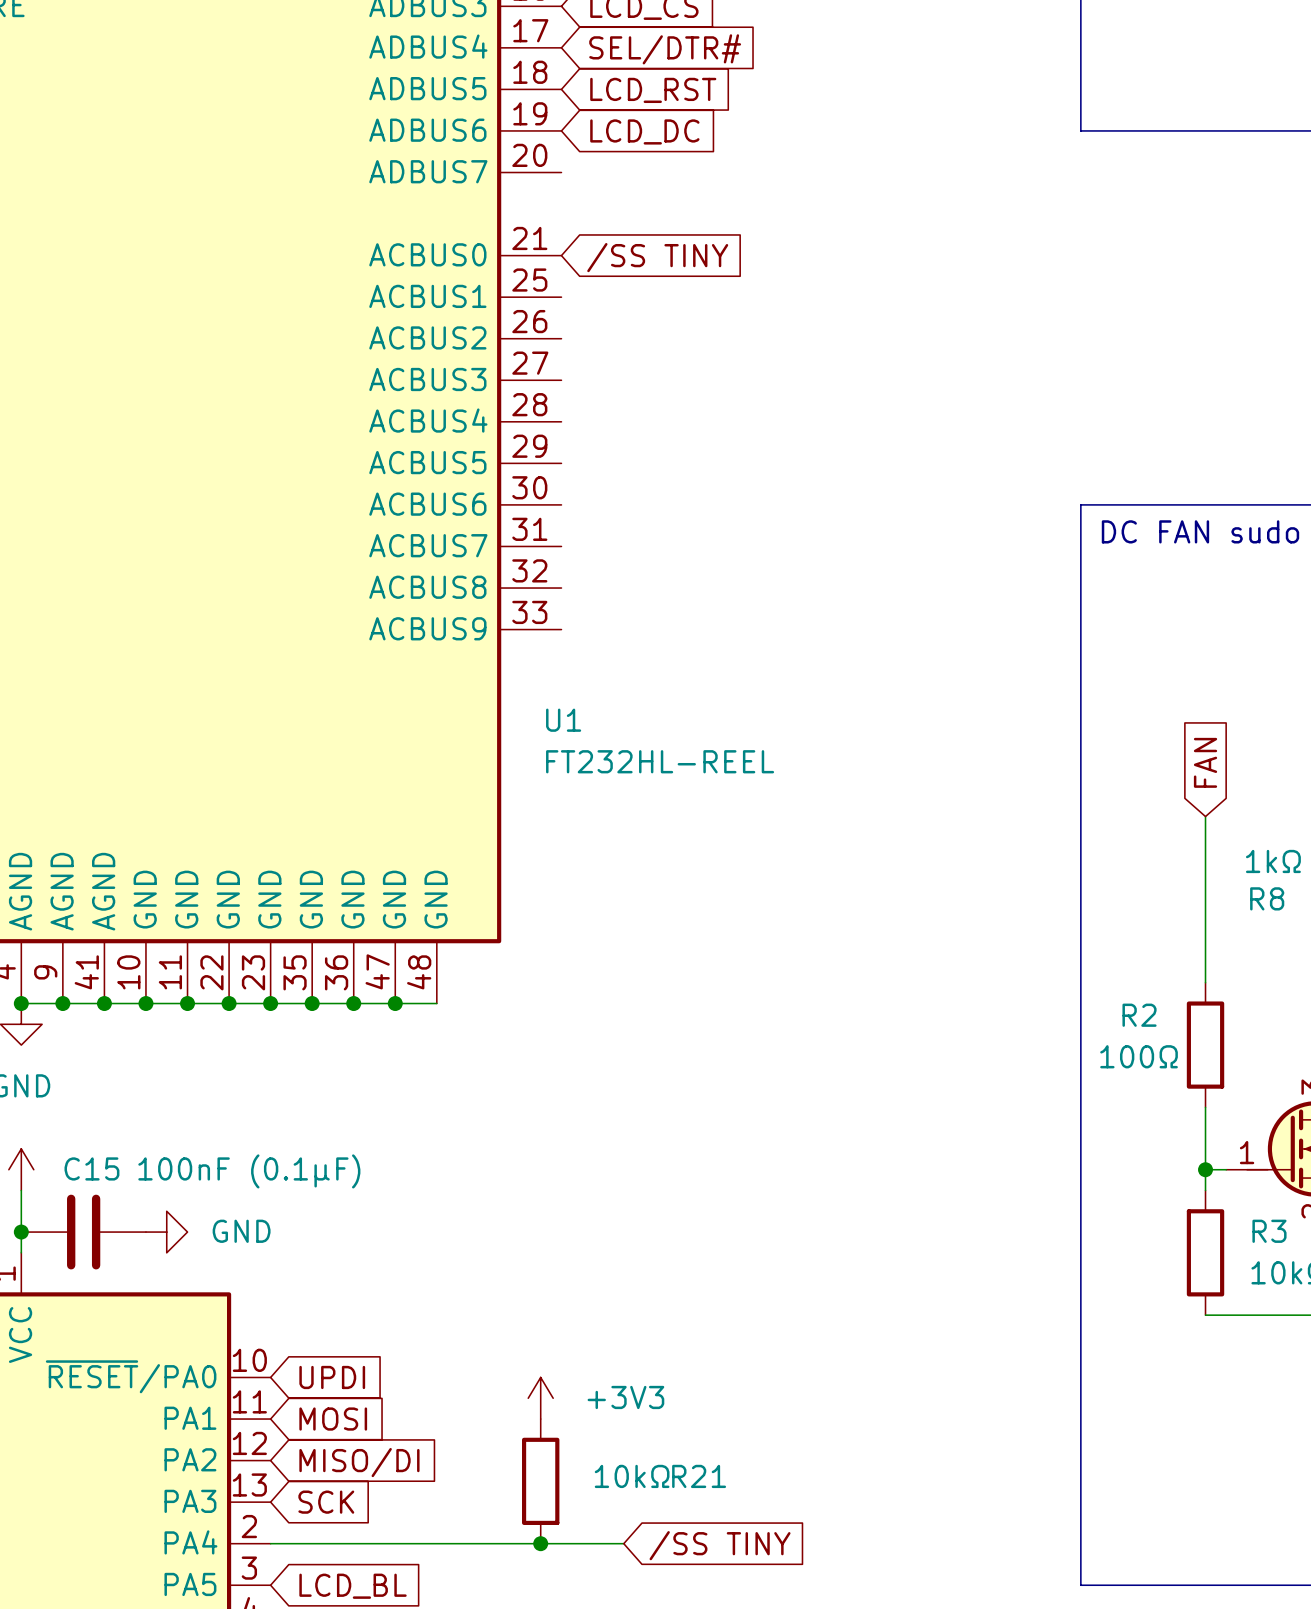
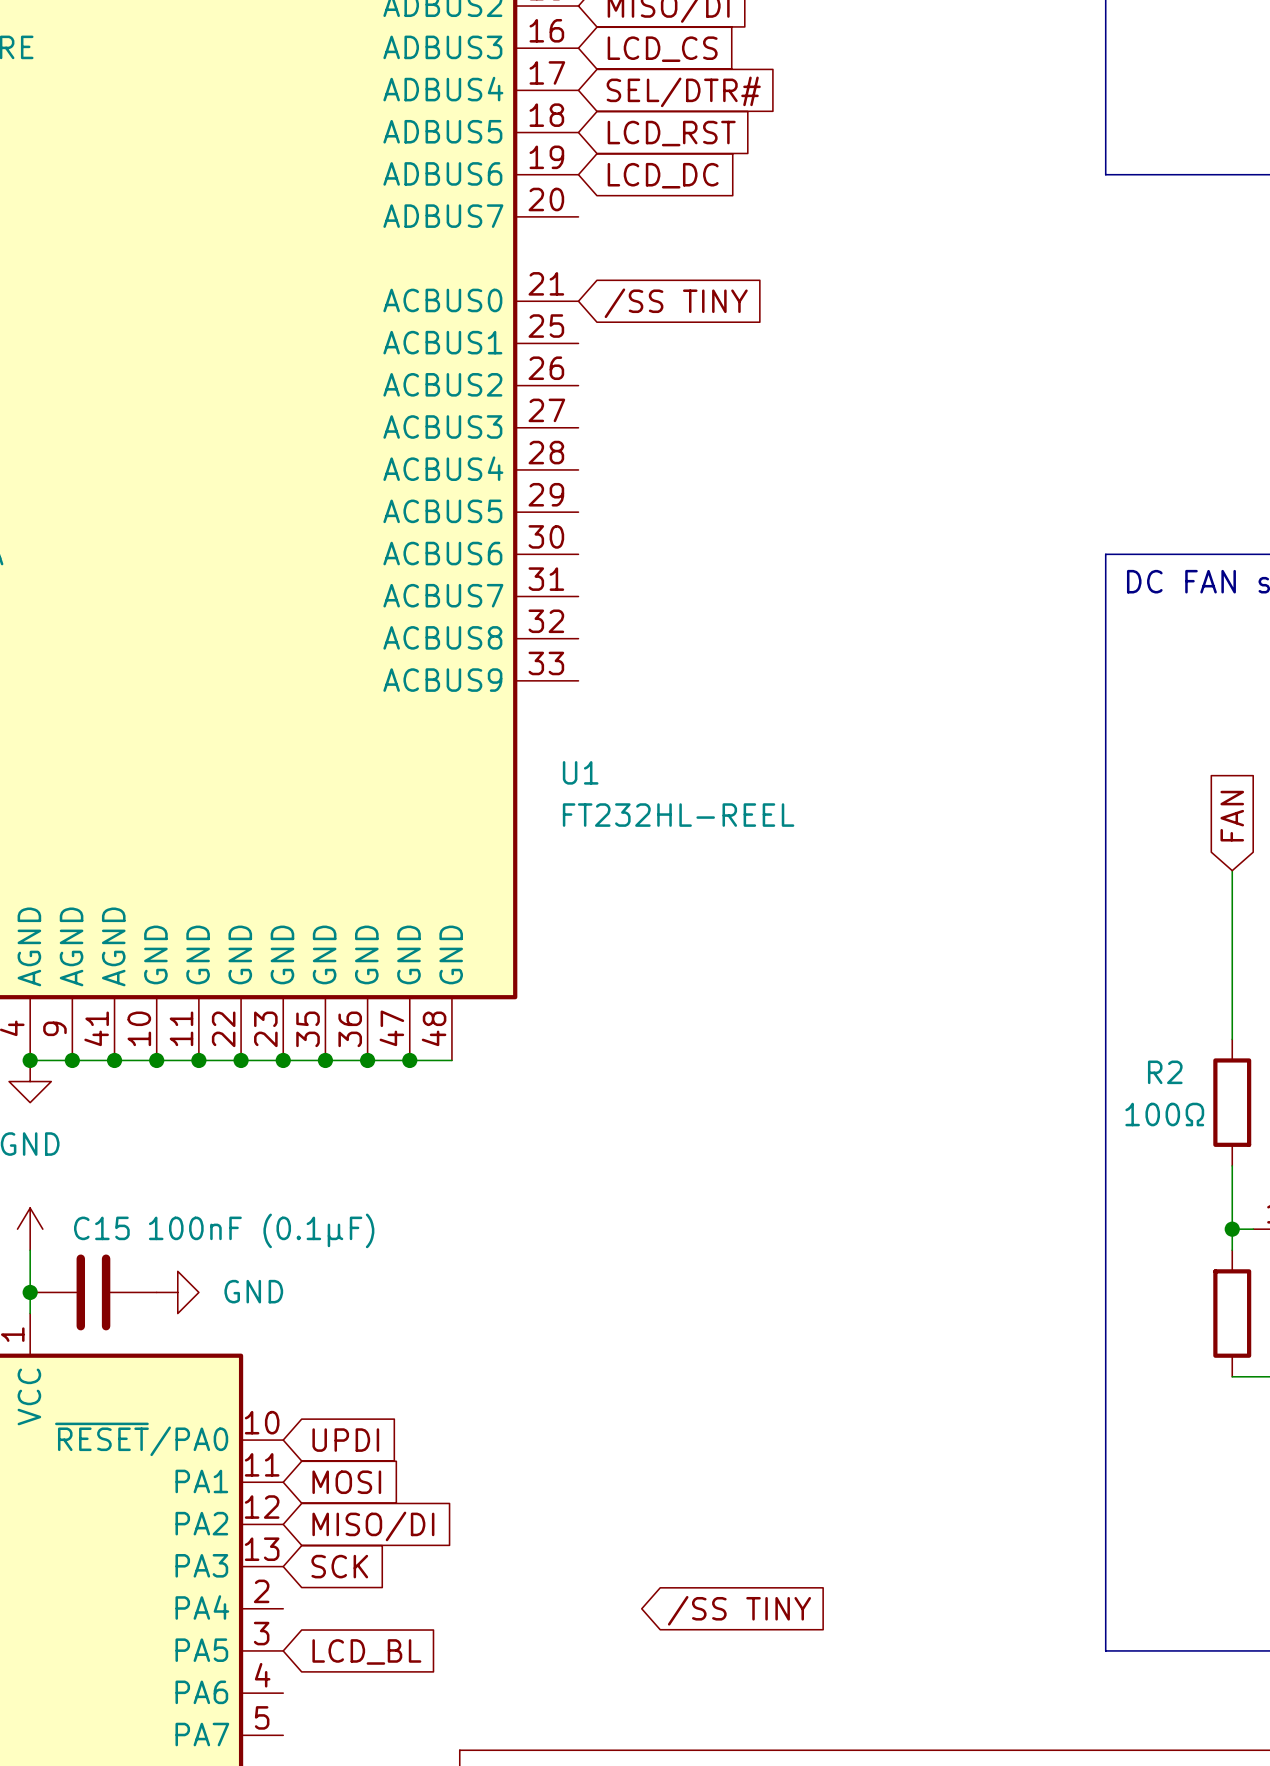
power symbol: +3V3 (540, 1398) -> none
R21: 10kΩ (540, 1481) -> none
wire: (270, 1543) (623, 1543) -> none
junction: (540, 1543) -> none

